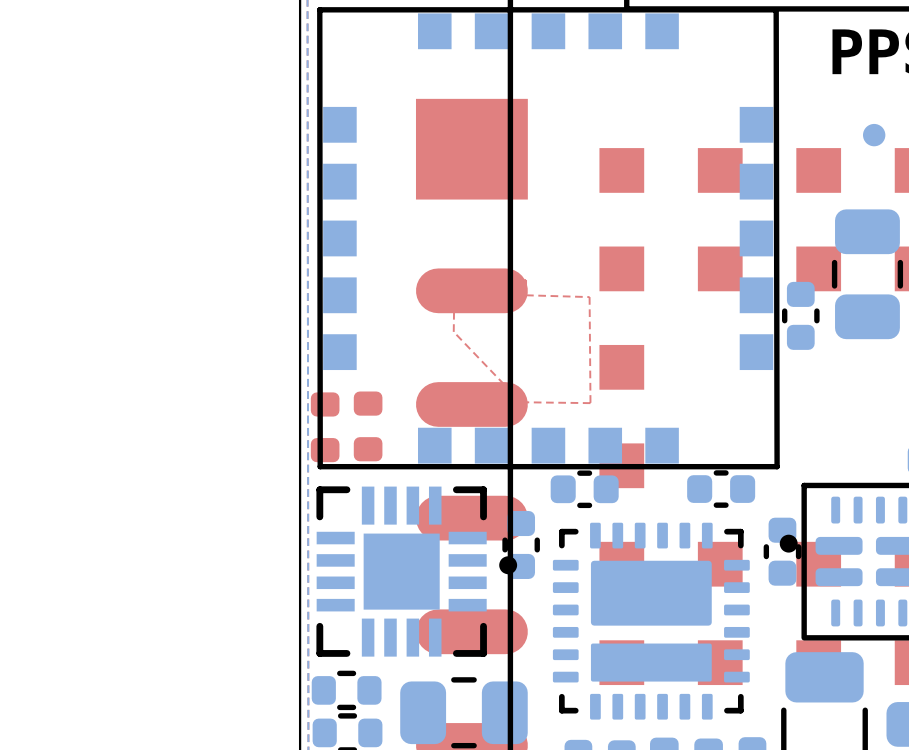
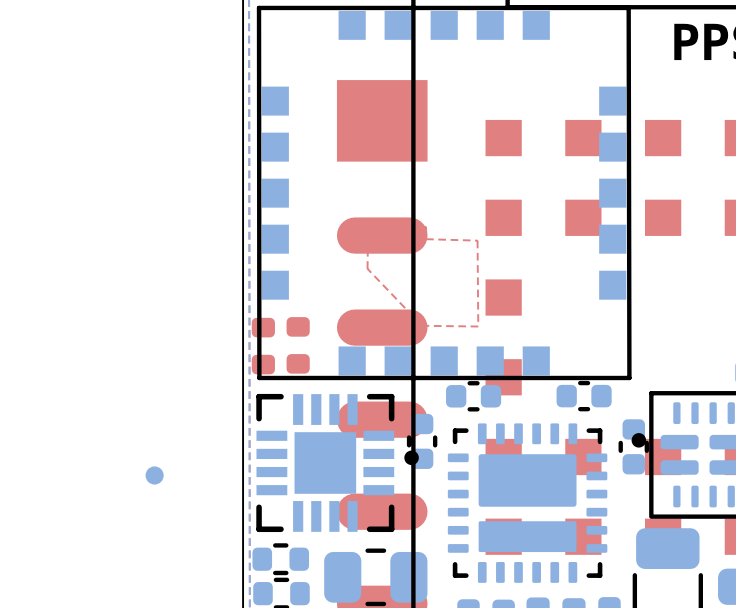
part position: (874, 135) -> (154, 475)
part: (867, 274) -> none
part: (800, 315) -> none

